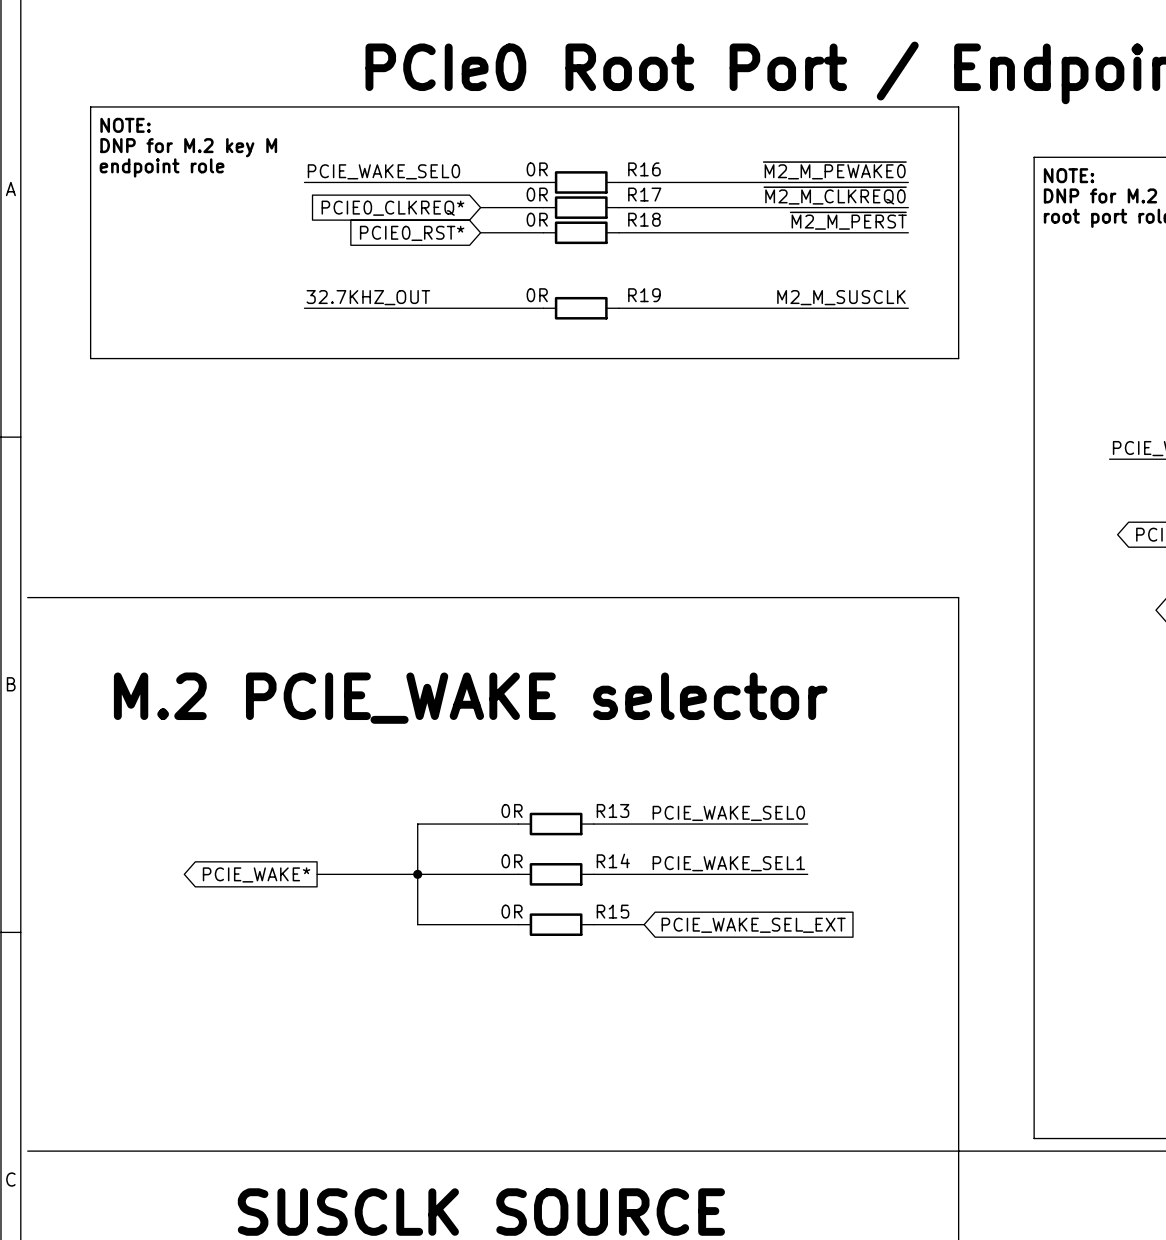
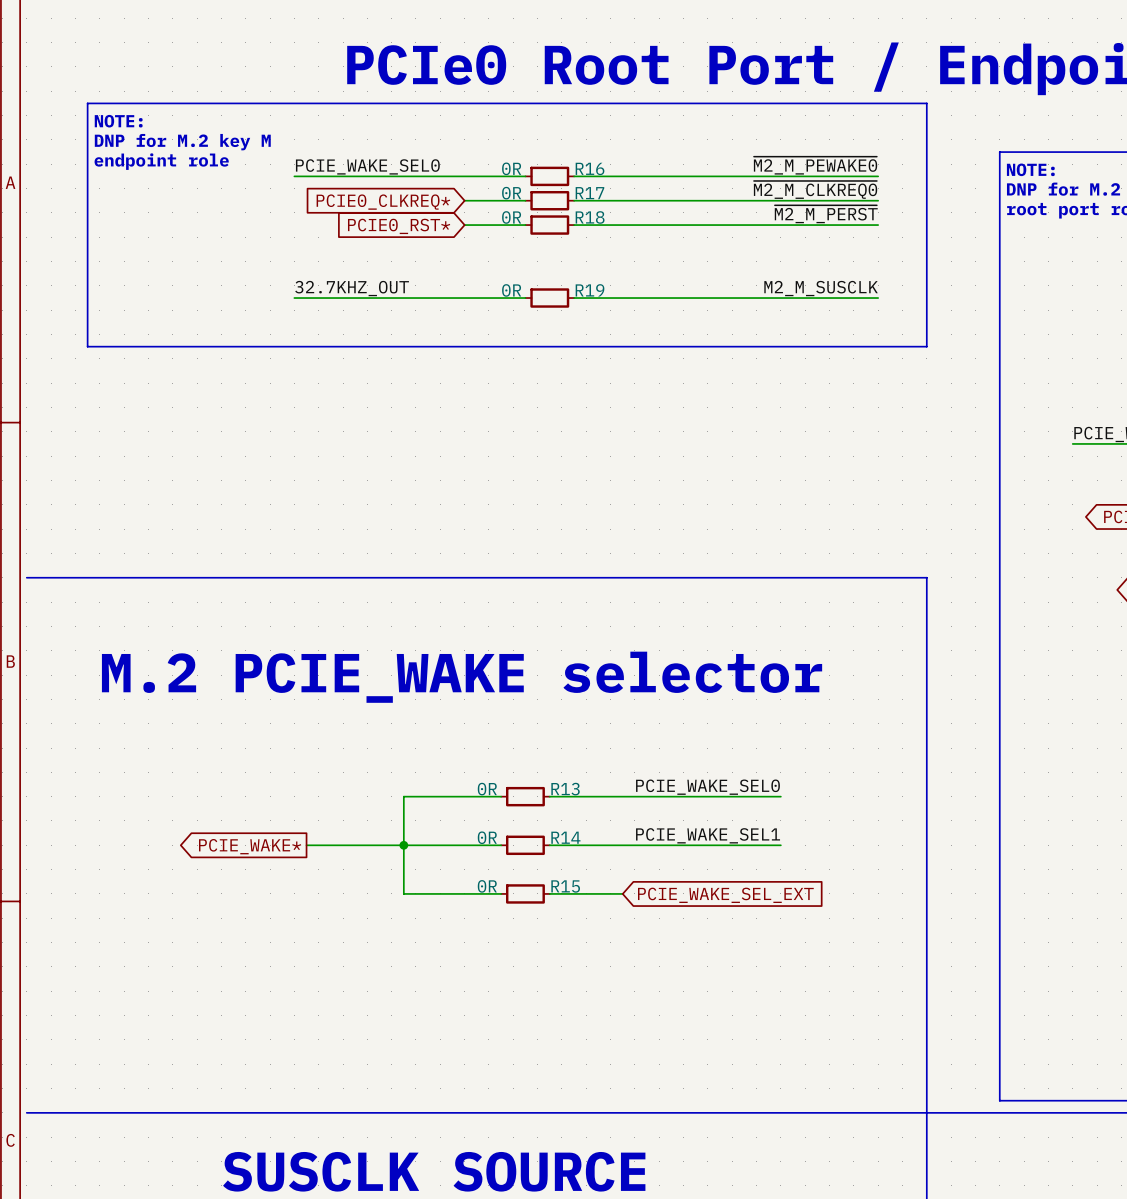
R16 symbol: [543, 171, 619, 194] -> [525, 166, 575, 187]
R17 symbol: [543, 196, 619, 219] -> [525, 190, 575, 211]
R18 symbol: [543, 221, 619, 245] -> [525, 215, 575, 235]
R19 symbol: [543, 296, 619, 320] -> [525, 288, 575, 308]
R13 symbol: [518, 812, 594, 836] -> [501, 786, 550, 807]
R14 symbol: [518, 863, 594, 886] -> [501, 835, 550, 856]
R15 symbol: [518, 913, 594, 936] -> [501, 884, 550, 904]

